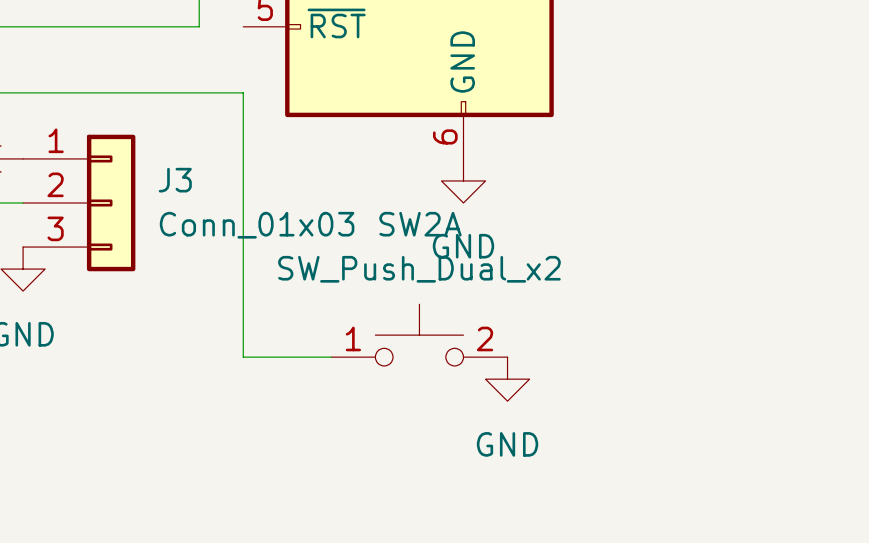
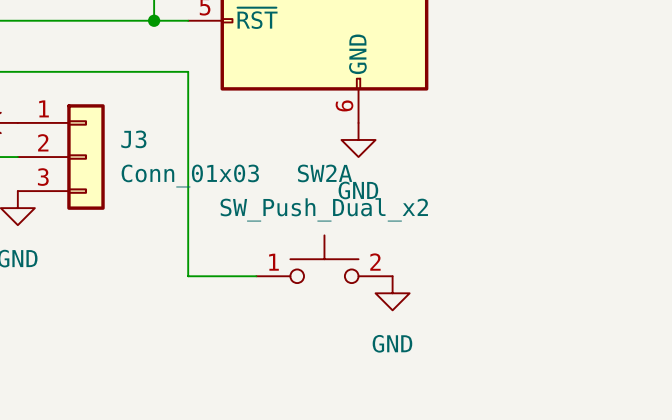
wire: none -> (154, 20) (188, 20)
junction: none -> (154, 20)

